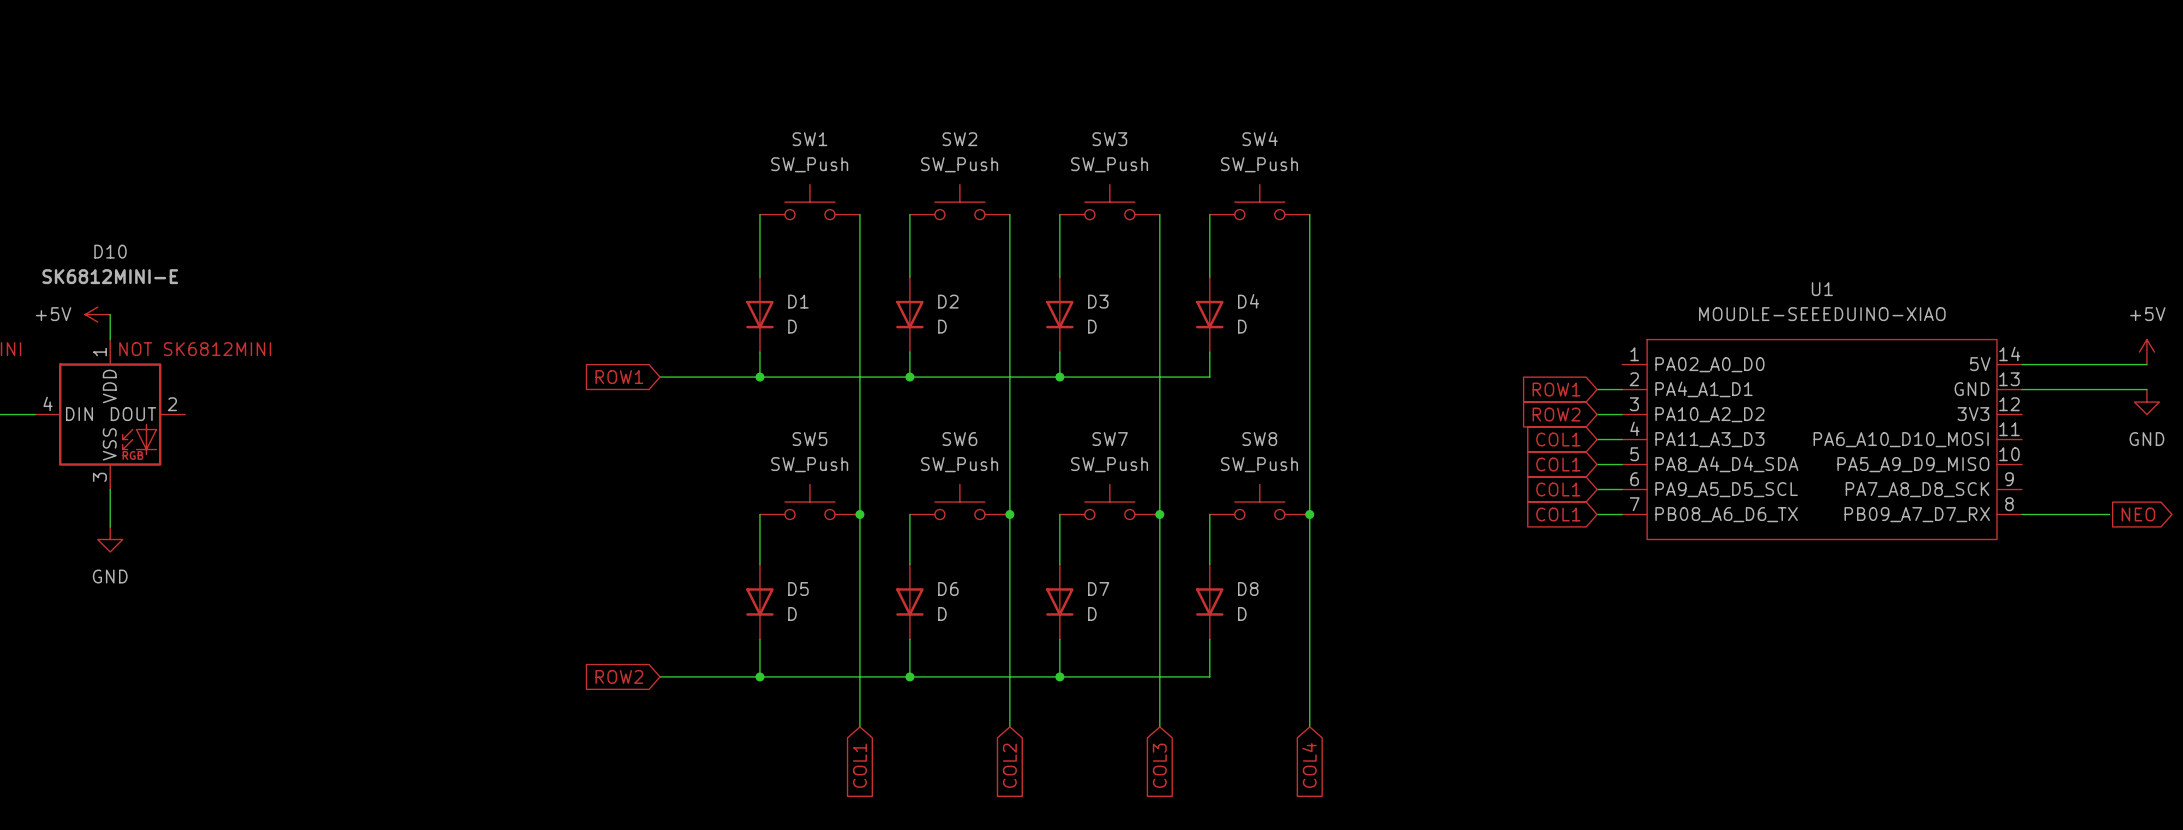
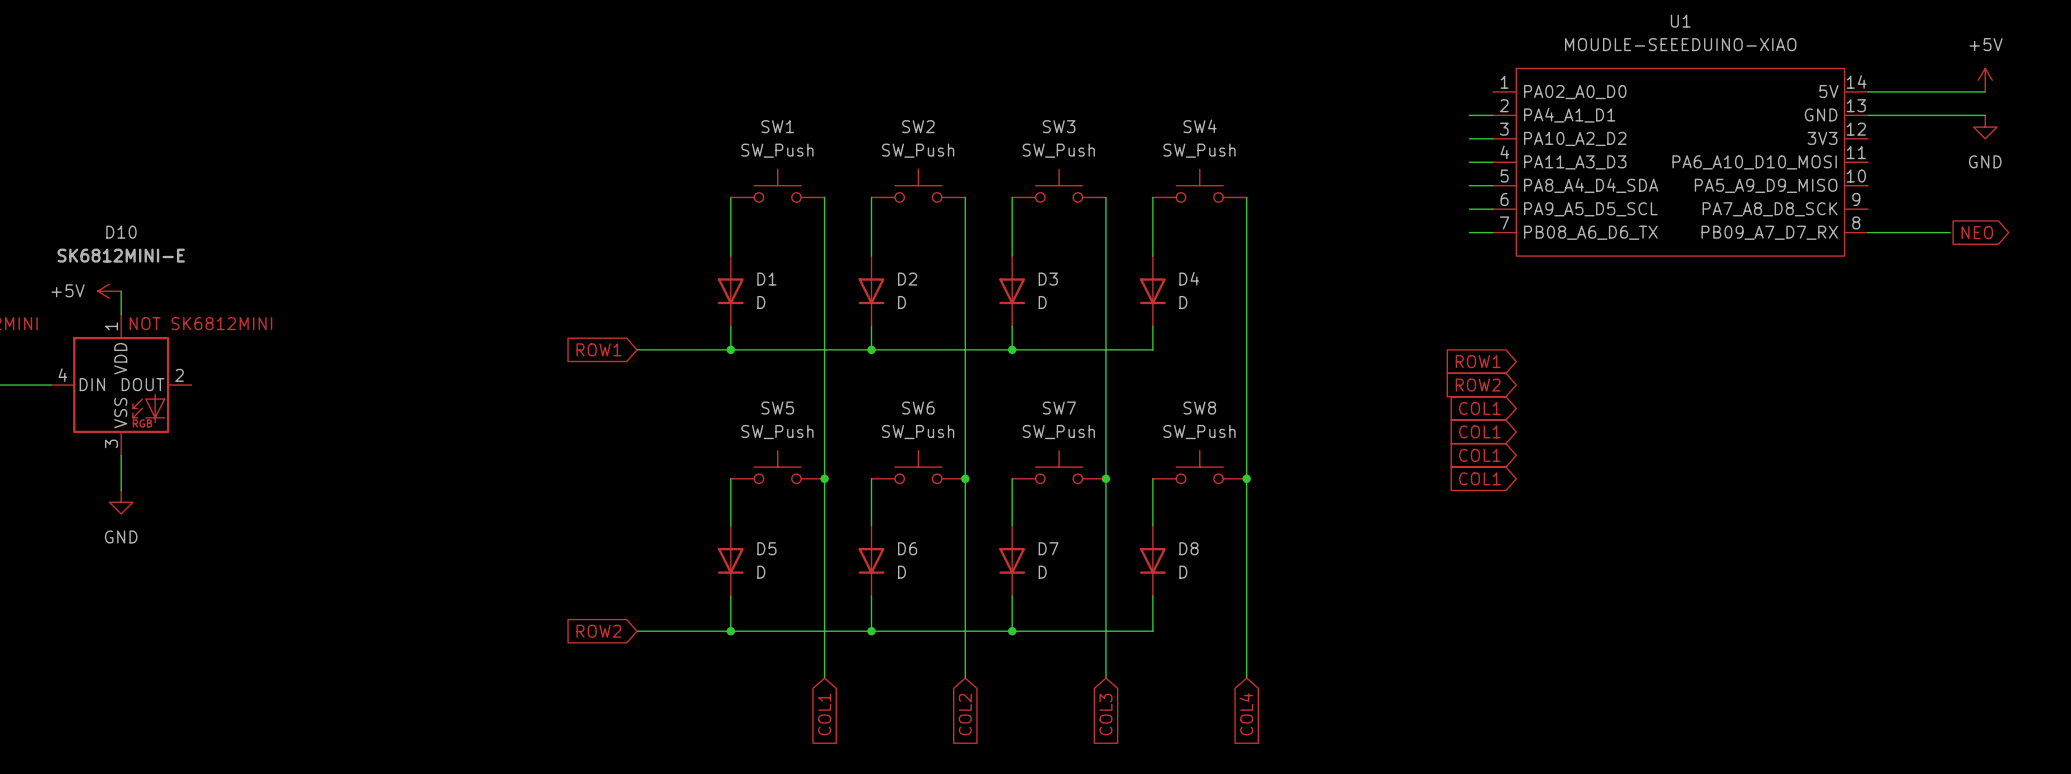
power symbol: none -> +5V (1985, 80)
wire: none -> (1868, 91) (1985, 91)
wire: none -> (1469, 115) (1492, 115)
power symbol: none -> GND (1985, 127)
wire: none -> (1868, 232) (1950, 232)
global label: none -> NEO (1977, 232)
power symbol: +5V (2146, 352) -> none
wire: (2021, 364) (2146, 364) -> (1868, 115) (1985, 115)
wire: (1597, 389) (1622, 389) -> (1469, 138) (1492, 138)
wire: (2021, 389) (2146, 389) -> none
power symbol: GND (2146, 402) -> none
wire: (1597, 414) (1622, 414) -> (1469, 162) (1492, 162)
wire: (1597, 439) (1622, 439) -> (1469, 185) (1492, 185)
U1 position: (1822, 439) -> (1680, 162)
wire: (1597, 464) (1622, 464) -> (1469, 209) (1492, 209)
wire: (1597, 489) (1622, 489) -> (1469, 232) (1492, 232)
wire: (1597, 514) (1622, 514) -> none
wire: (2021, 514) (2109, 514) -> none
global label: NEO (2138, 514) -> none

